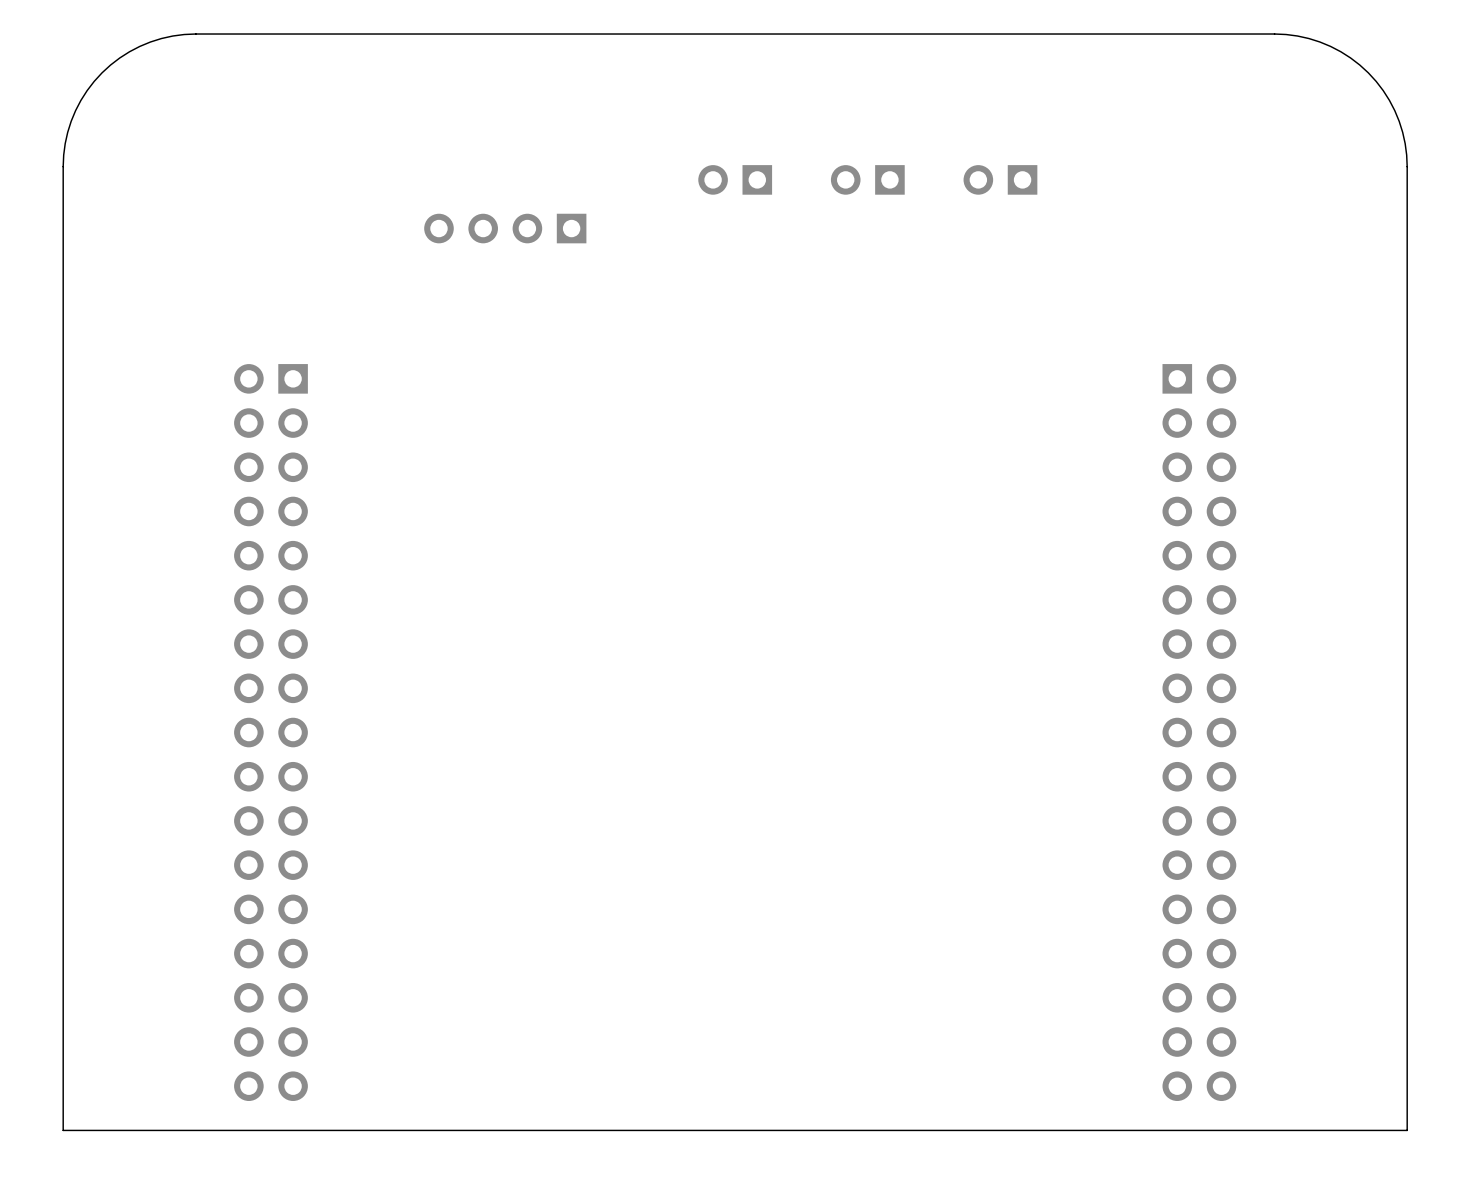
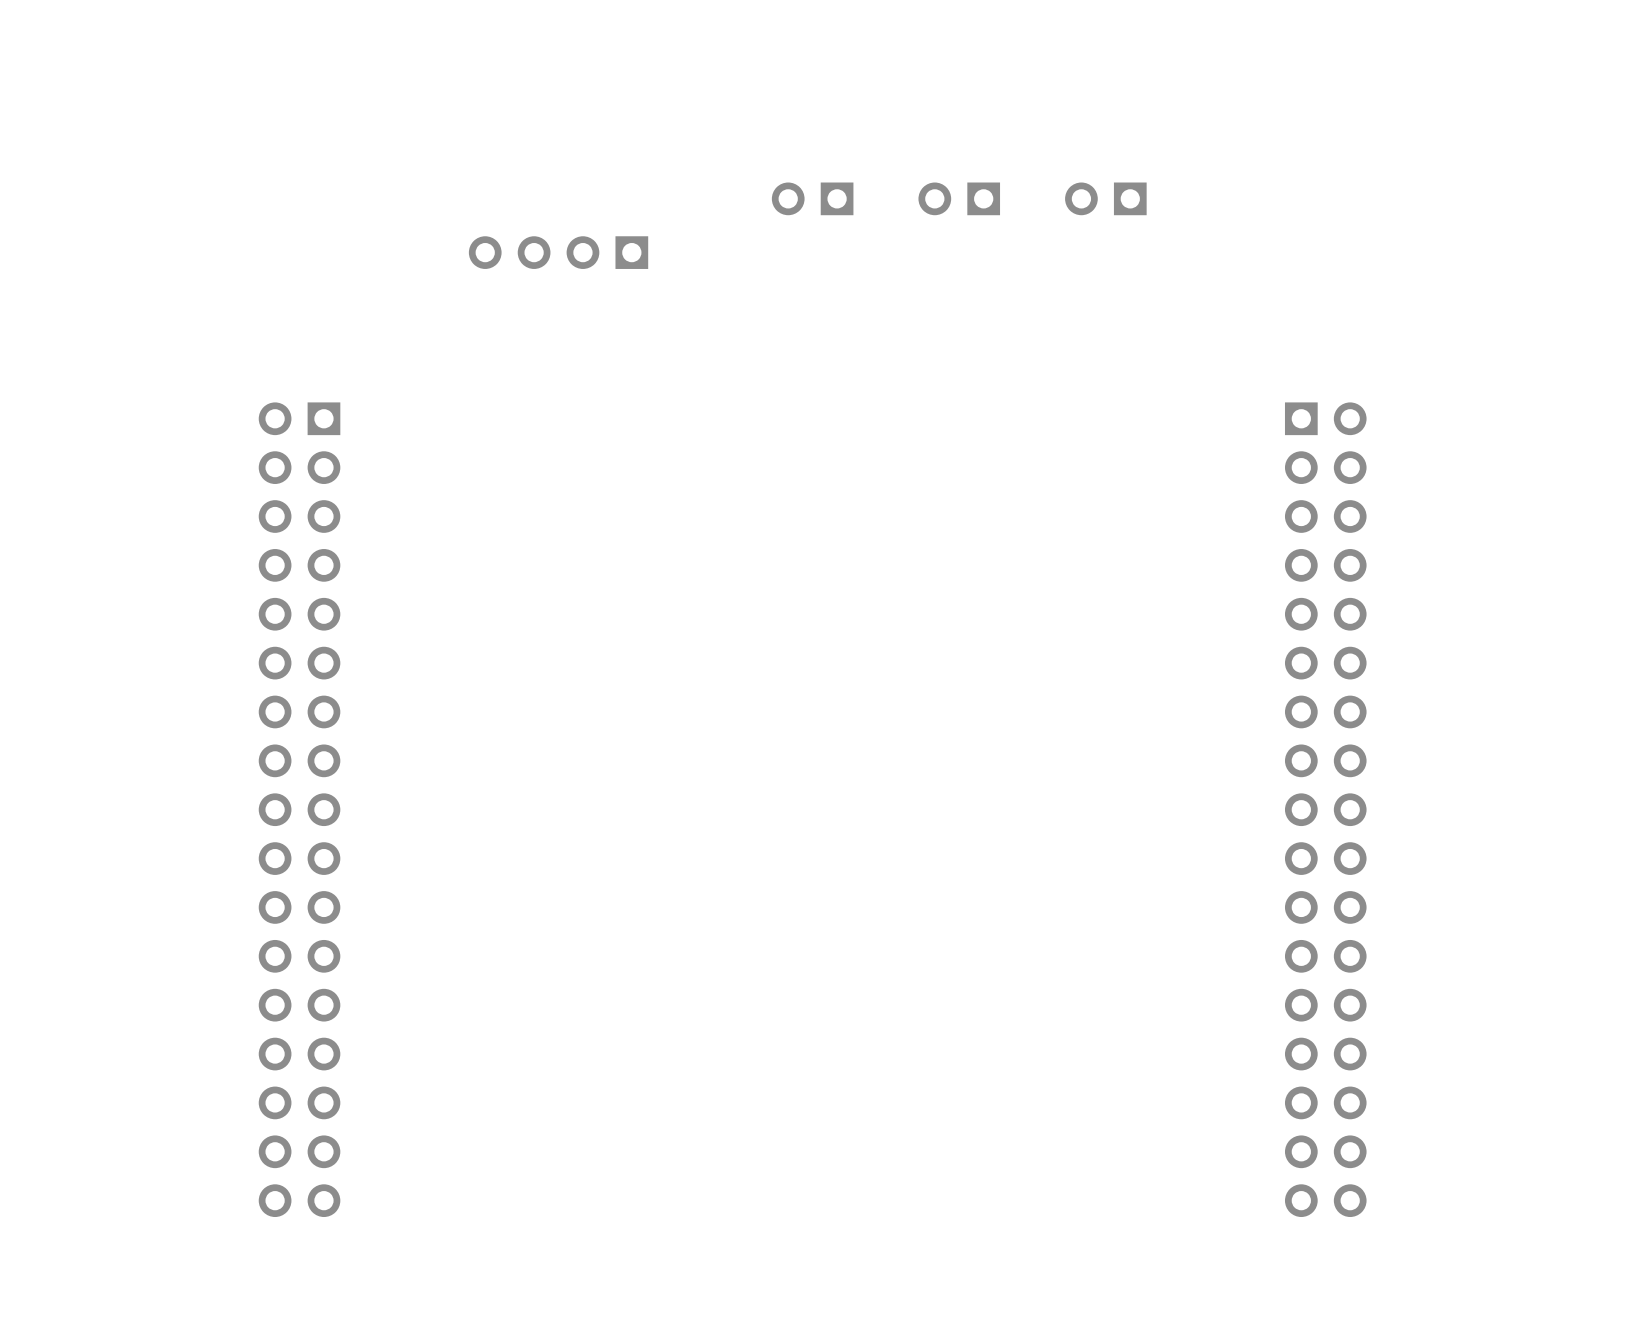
board edge: (1274, 34) (195, 34) (172, 36) (150, 42) (129, 51) (110, 65) (87, 90) (75, 110) (67, 132) (63, 155) (63, 1130) (1407, 1130) (1406, 155) (1399, 121) (1389, 100) (1376, 81) (1359, 65) (1340, 51) (1319, 42) (1297, 36) (1274, 34) -> none

